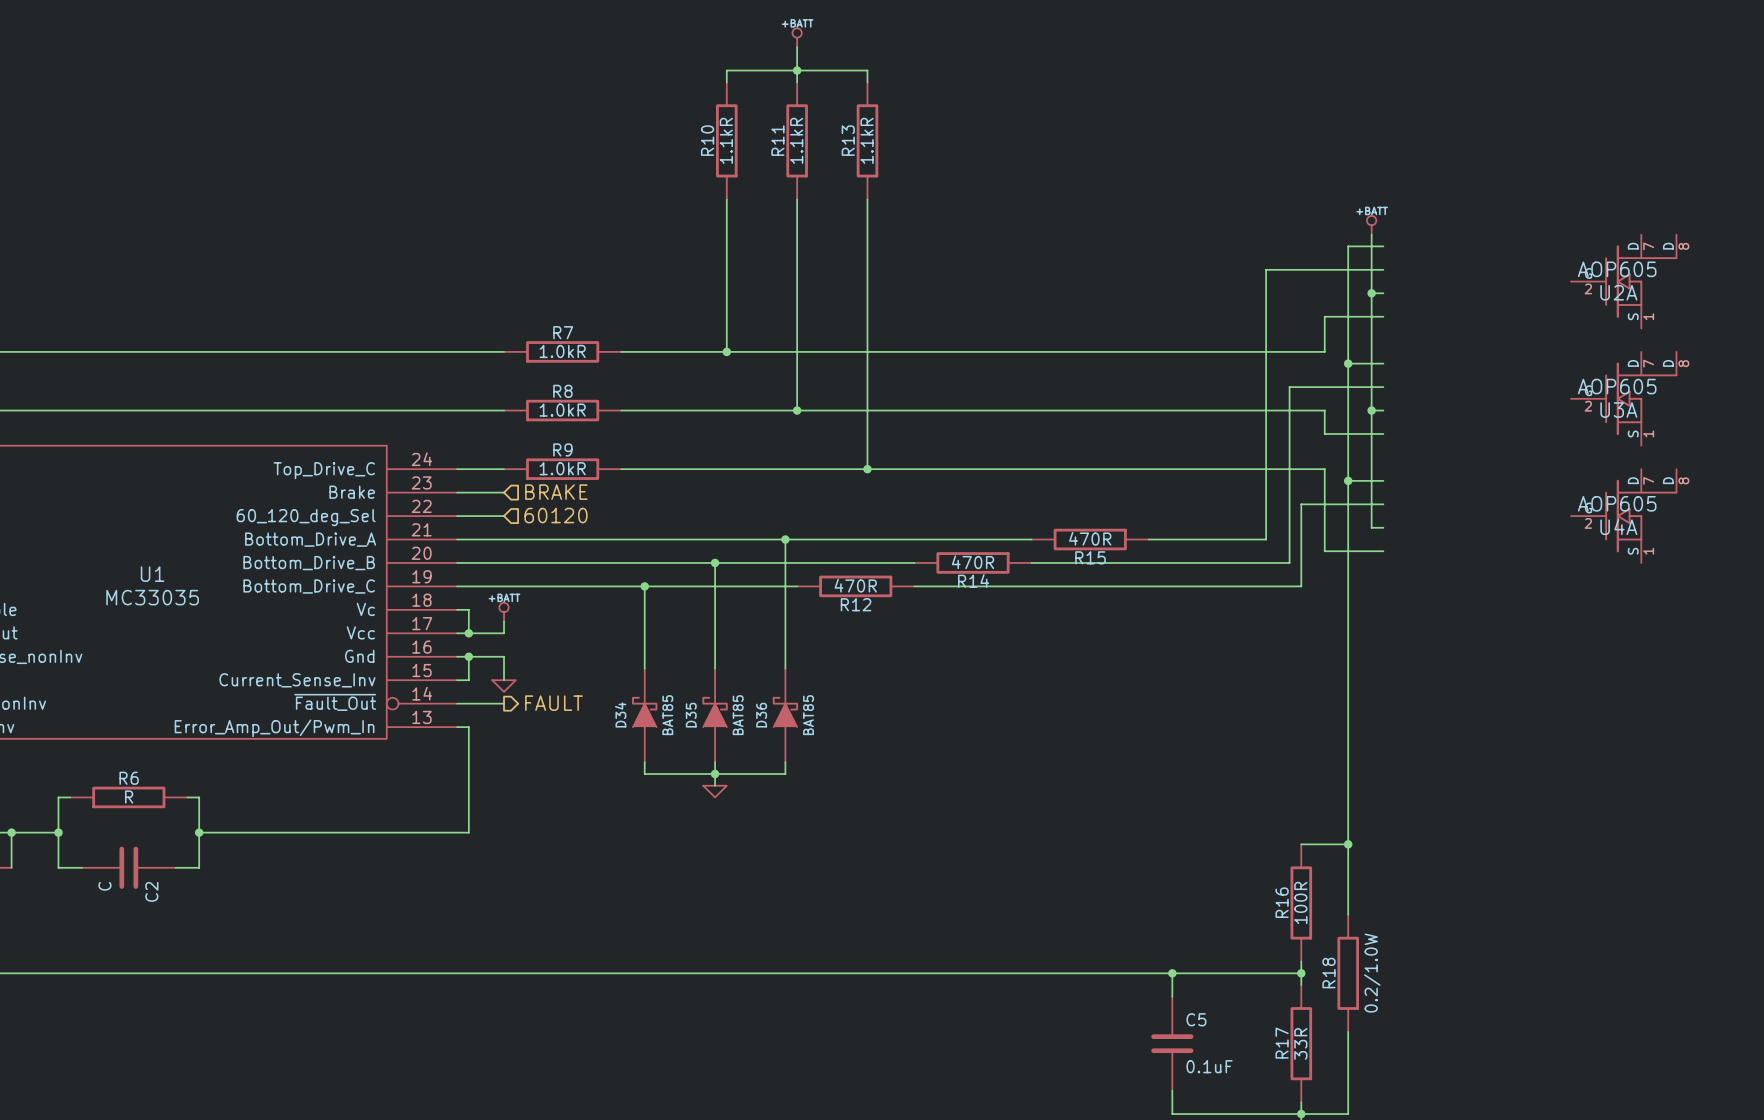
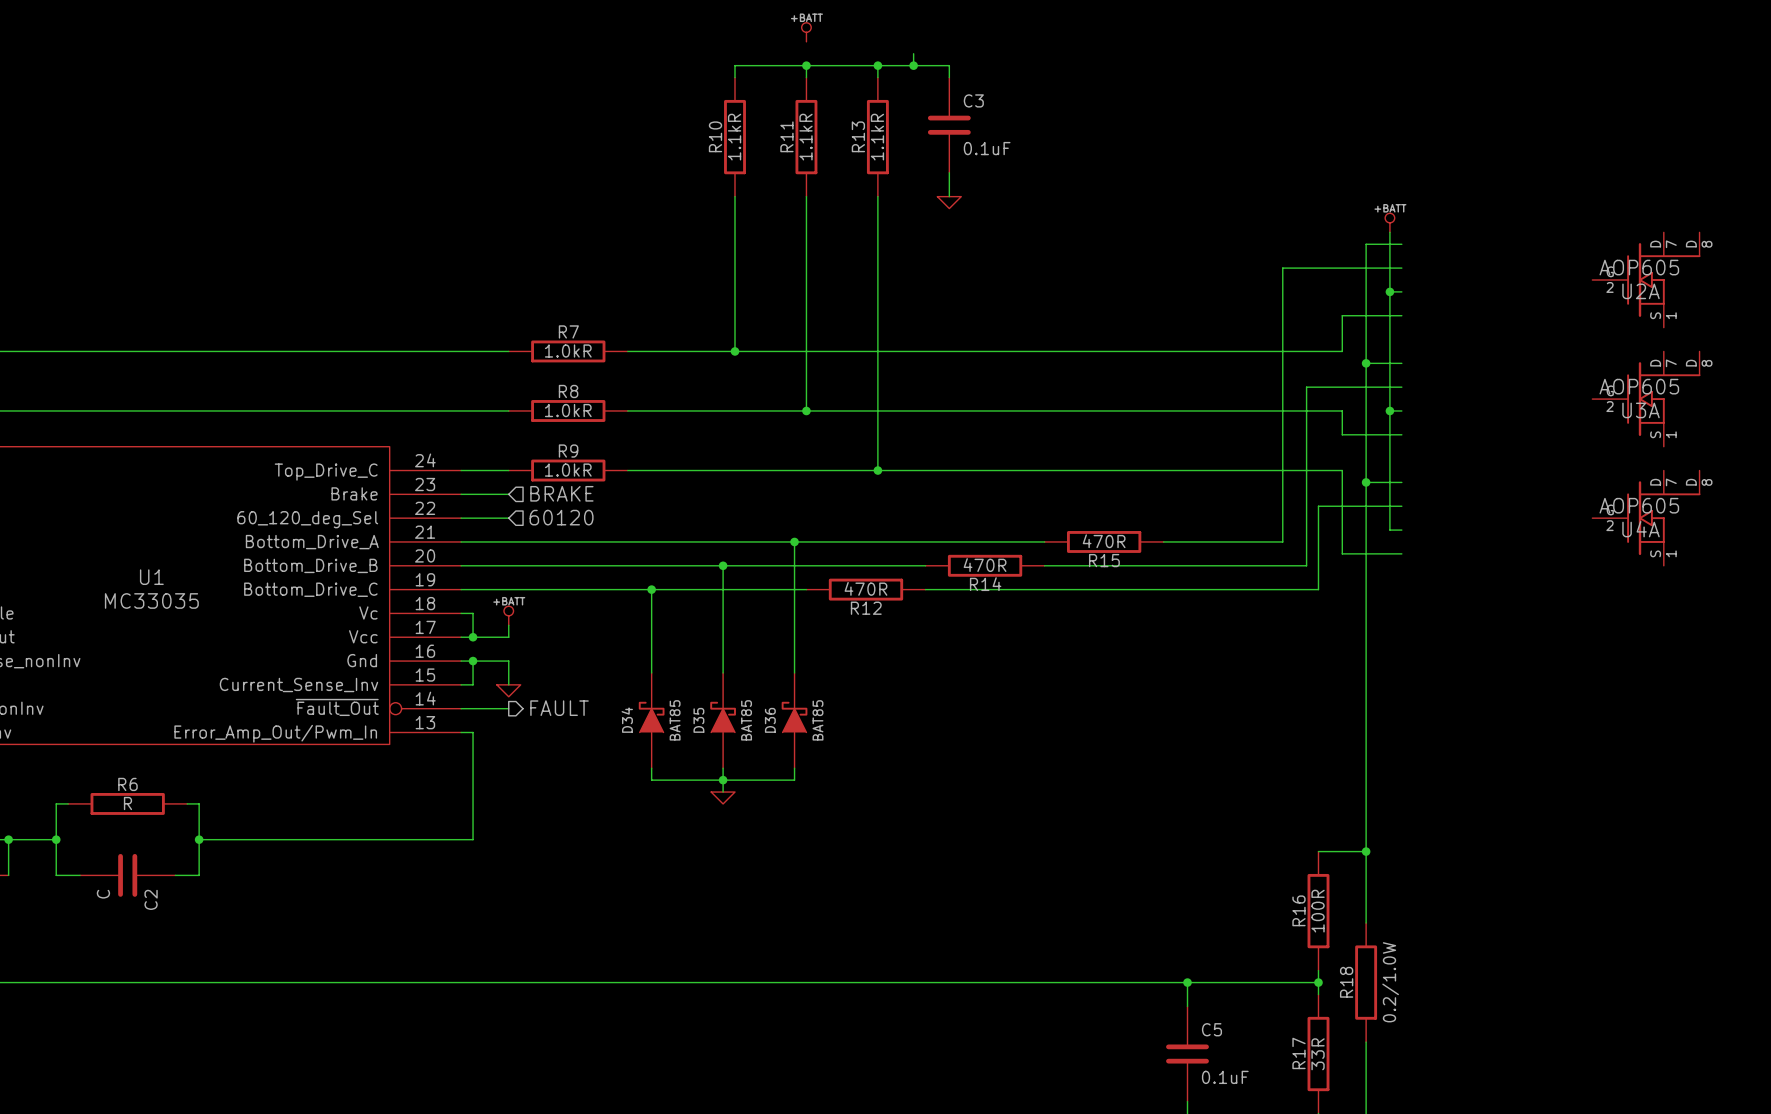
wire: (797, 47) (797, 70) -> (949, 172) (949, 196)
wire: none -> (913, 53) (913, 65)
wire: none -> (877, 65) (949, 65) (949, 77)
junction: none -> (877, 65)
junction: none -> (913, 65)
C3: none -> 0.1uF (949, 125)
power symbol: none -> (949, 202)

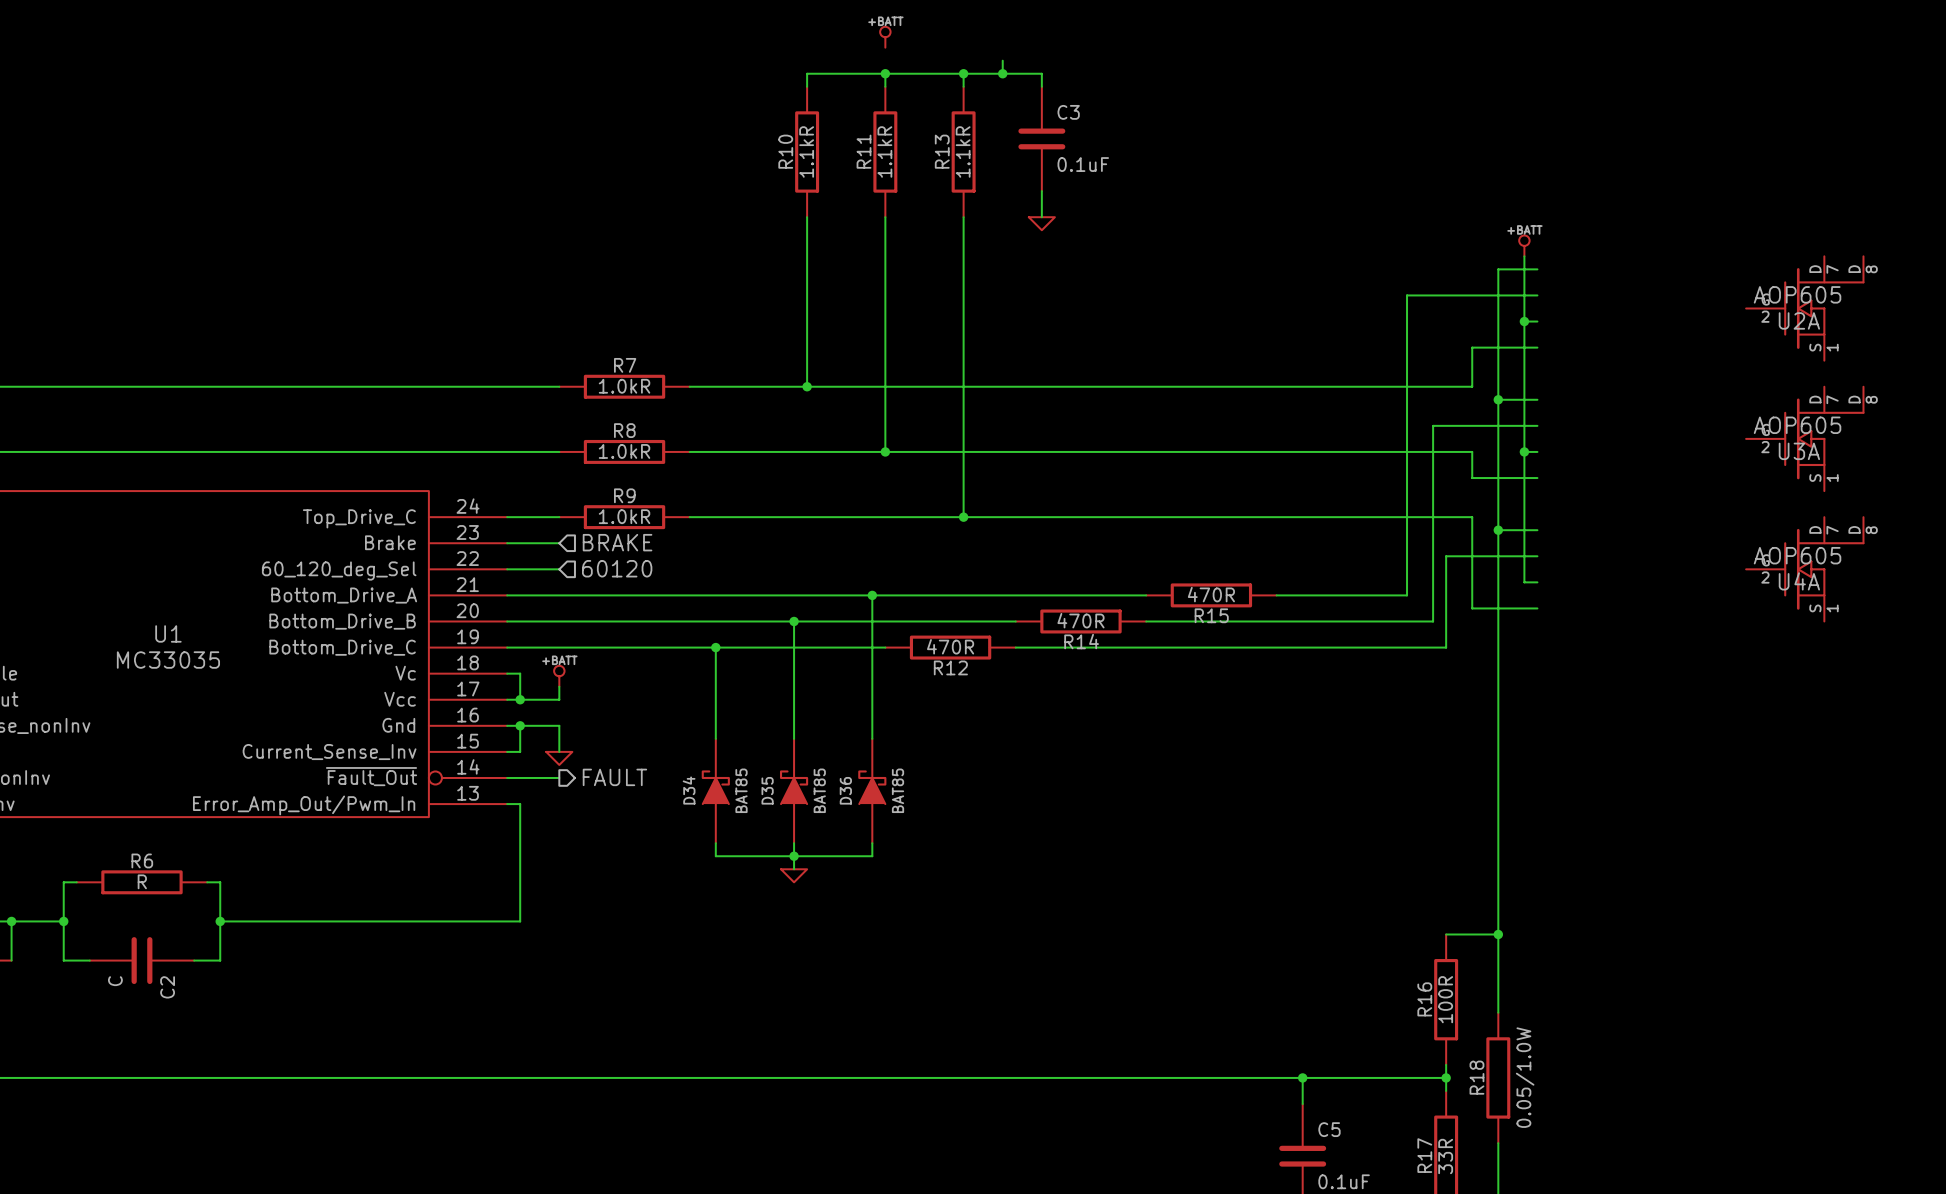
R18 value: 0.2/1.0W (1390, 982) -> 0.05/1.0W (1525, 1077)

